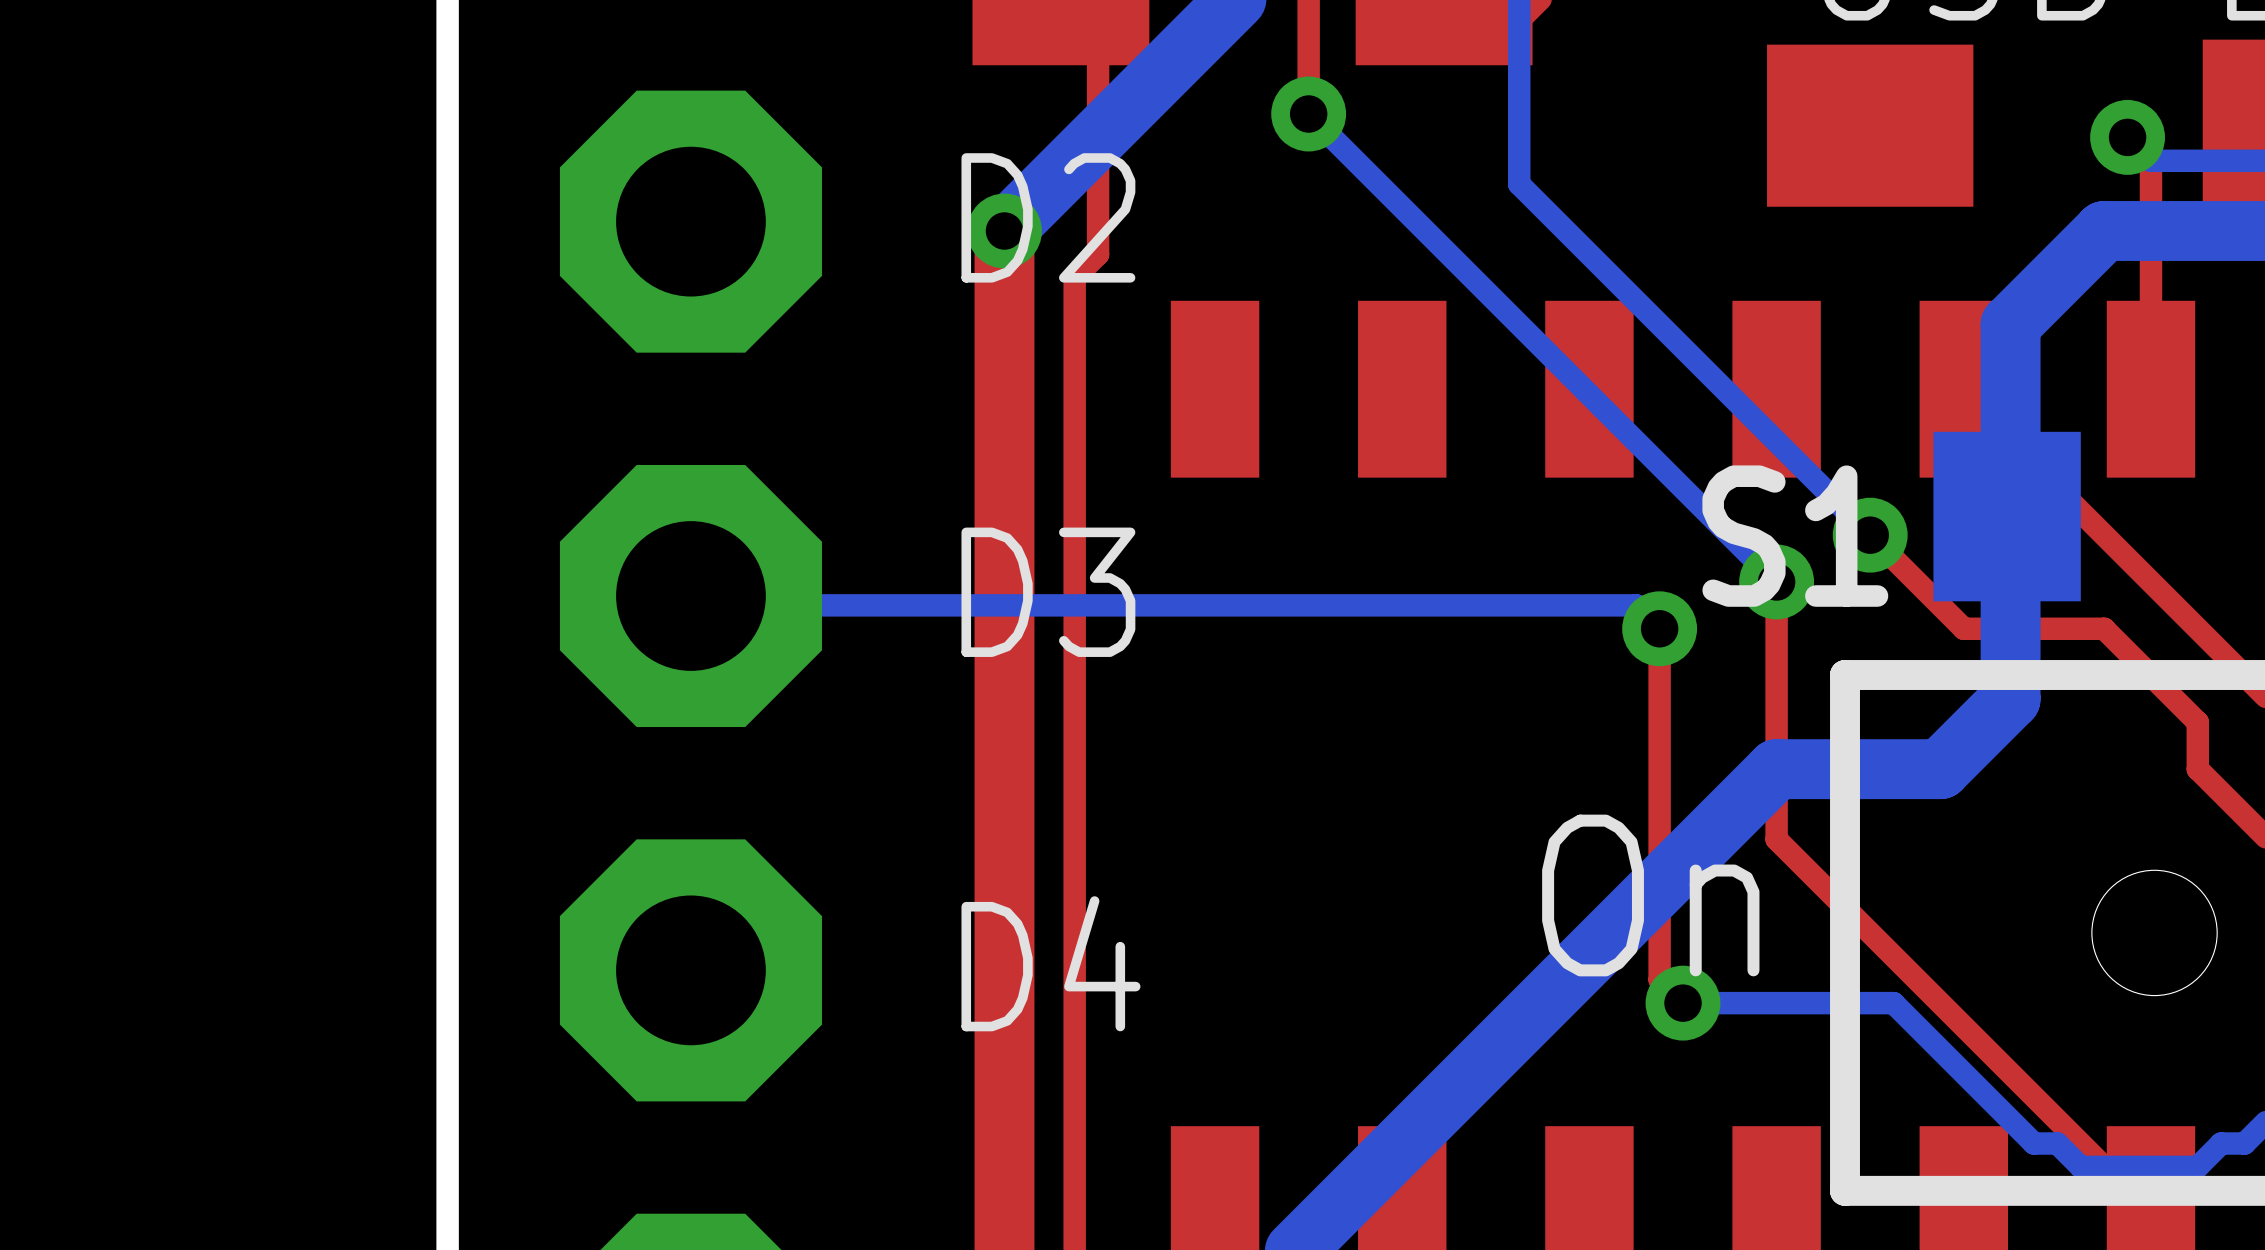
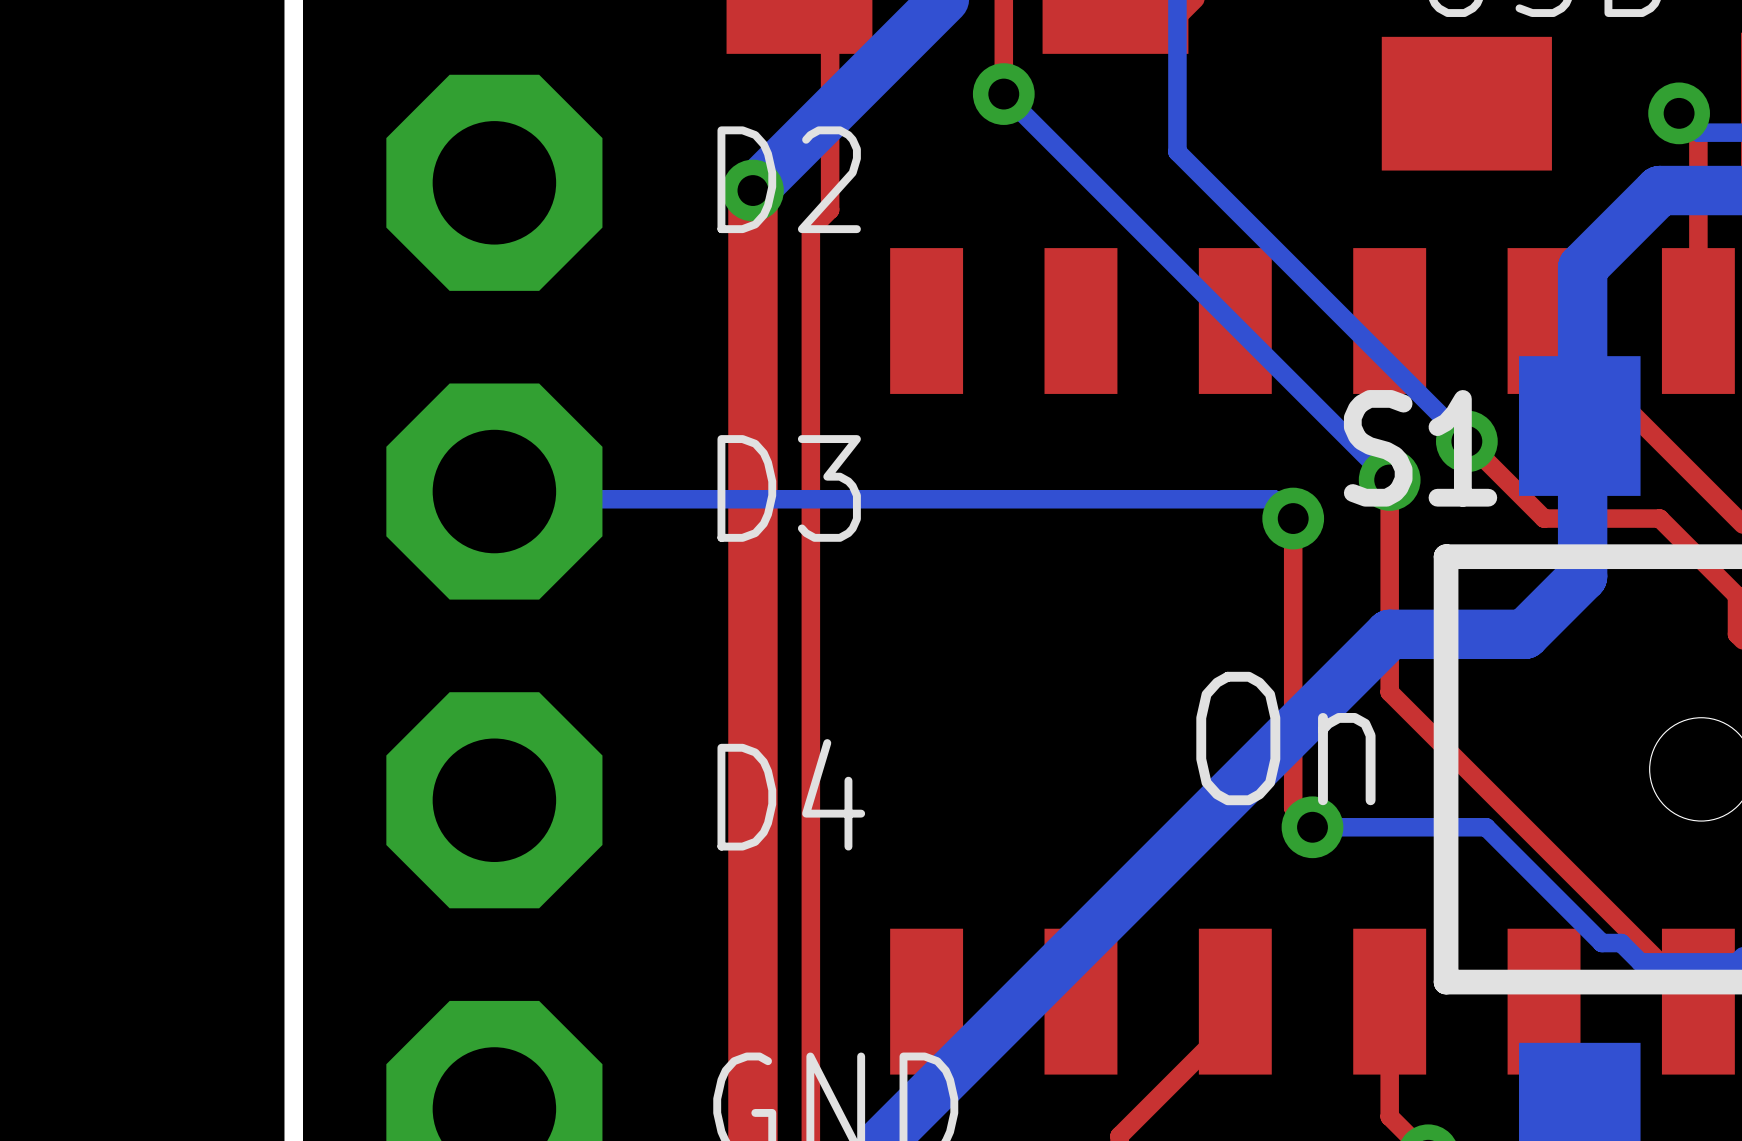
S1 name position: S1 (1795, 536) -> S1 (1420, 448)

